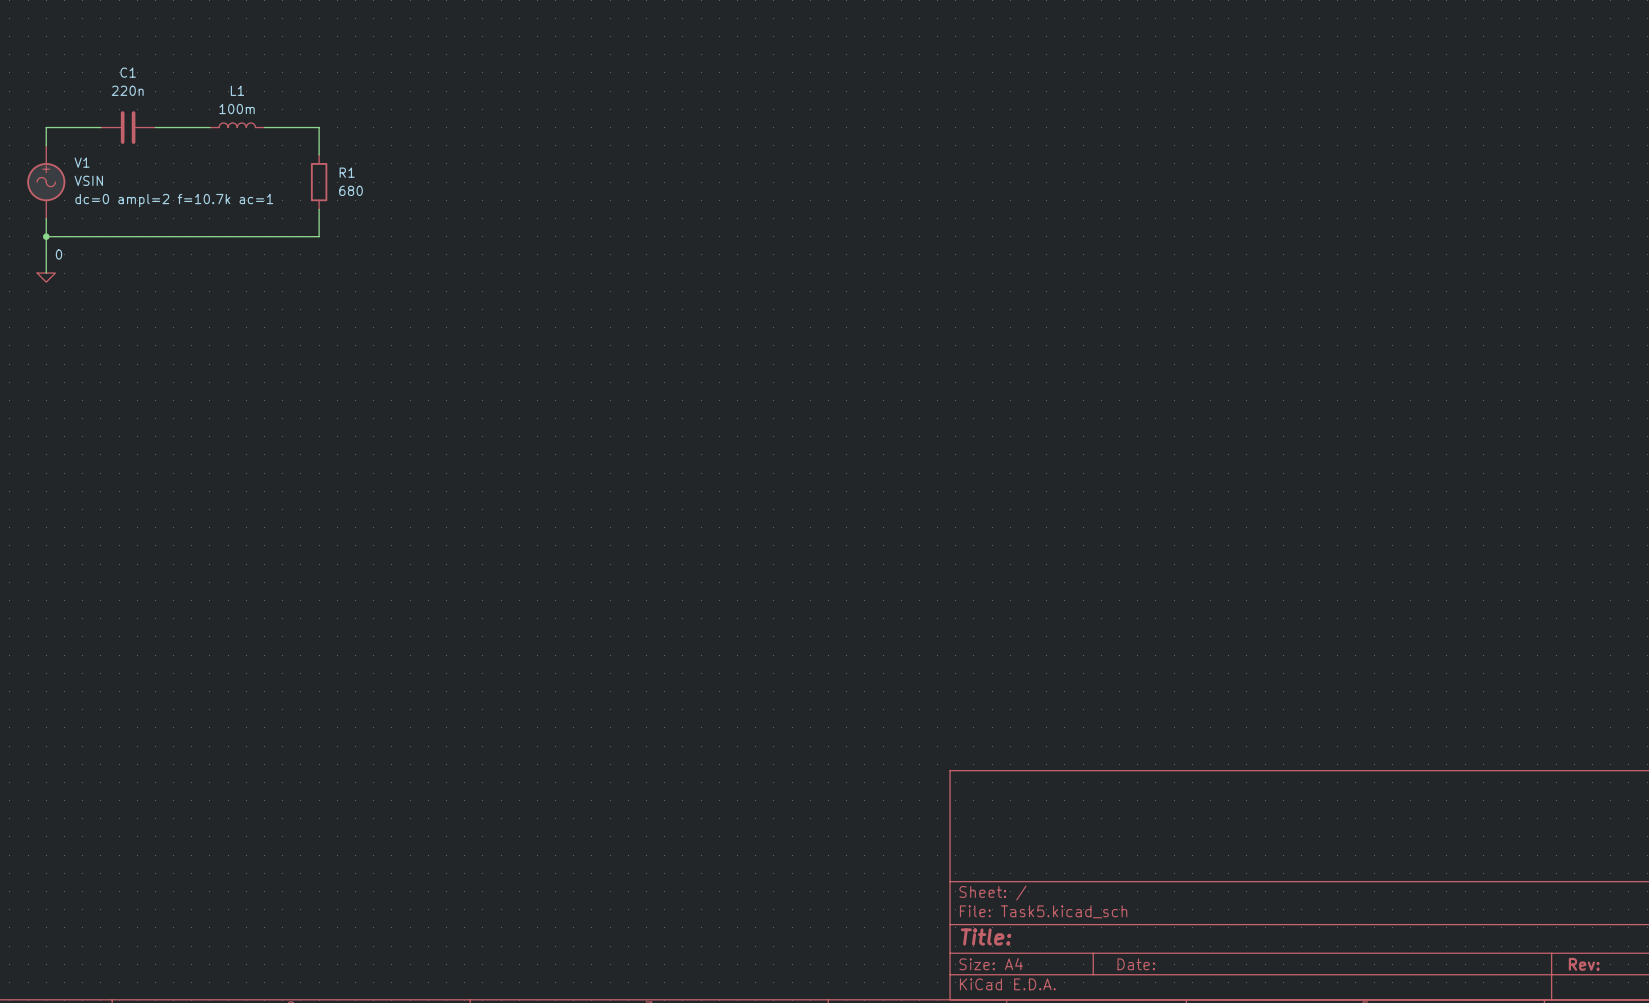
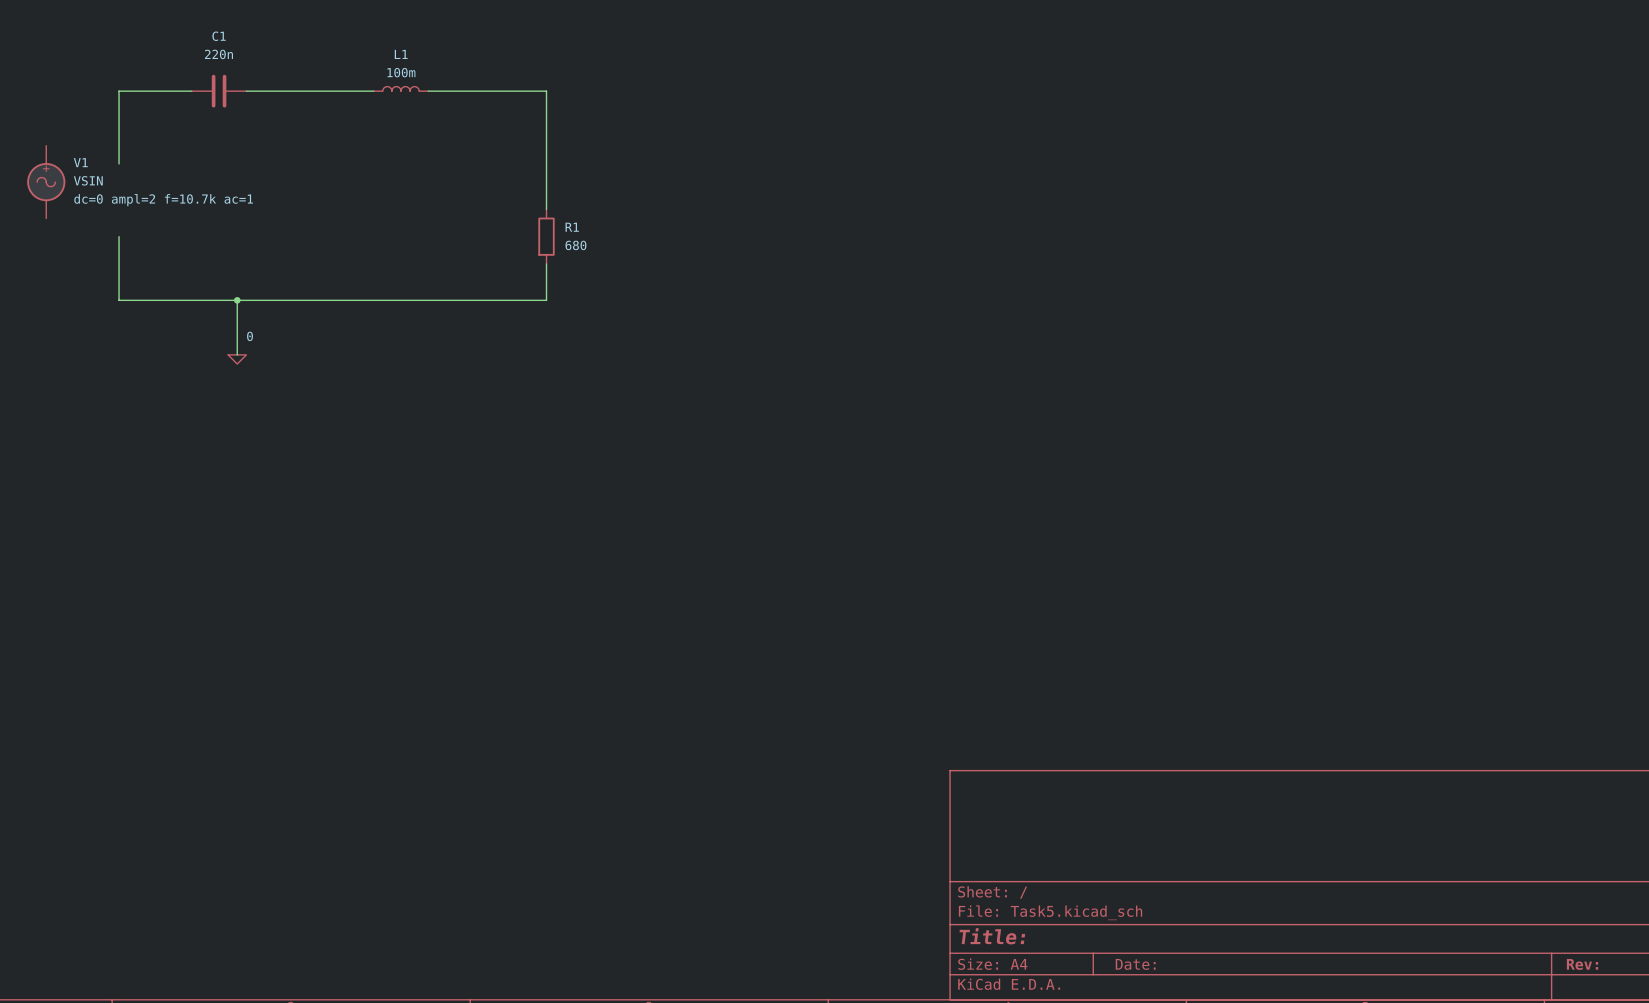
wire: none -> (191, 91) (119, 91) (119, 163)
wire: none -> (246, 91) (373, 91)
wire: none -> (428, 91) (546, 91) (546, 209)
L1 position: (237, 125) -> (400, 88)
wire: (100, 127) (46, 127) (46, 145) -> none
C1 position: (128, 127) -> (219, 91)
wire: (155, 127) (209, 127) -> none
wire: (264, 127) (319, 127) (319, 154) -> none
R1 position: (319, 182) -> (546, 236)
wire: (319, 209) (319, 236) (46, 236) -> none
wire: (46, 218) (46, 273) -> none
junction: (46, 236) -> none
wire: none -> (119, 236) (119, 300) (546, 300) (546, 263)
power symbol: 0 (46, 277) -> none
wire: none -> (237, 300) (237, 354)
junction: none -> (237, 300)
power symbol: none -> 0 (237, 359)

